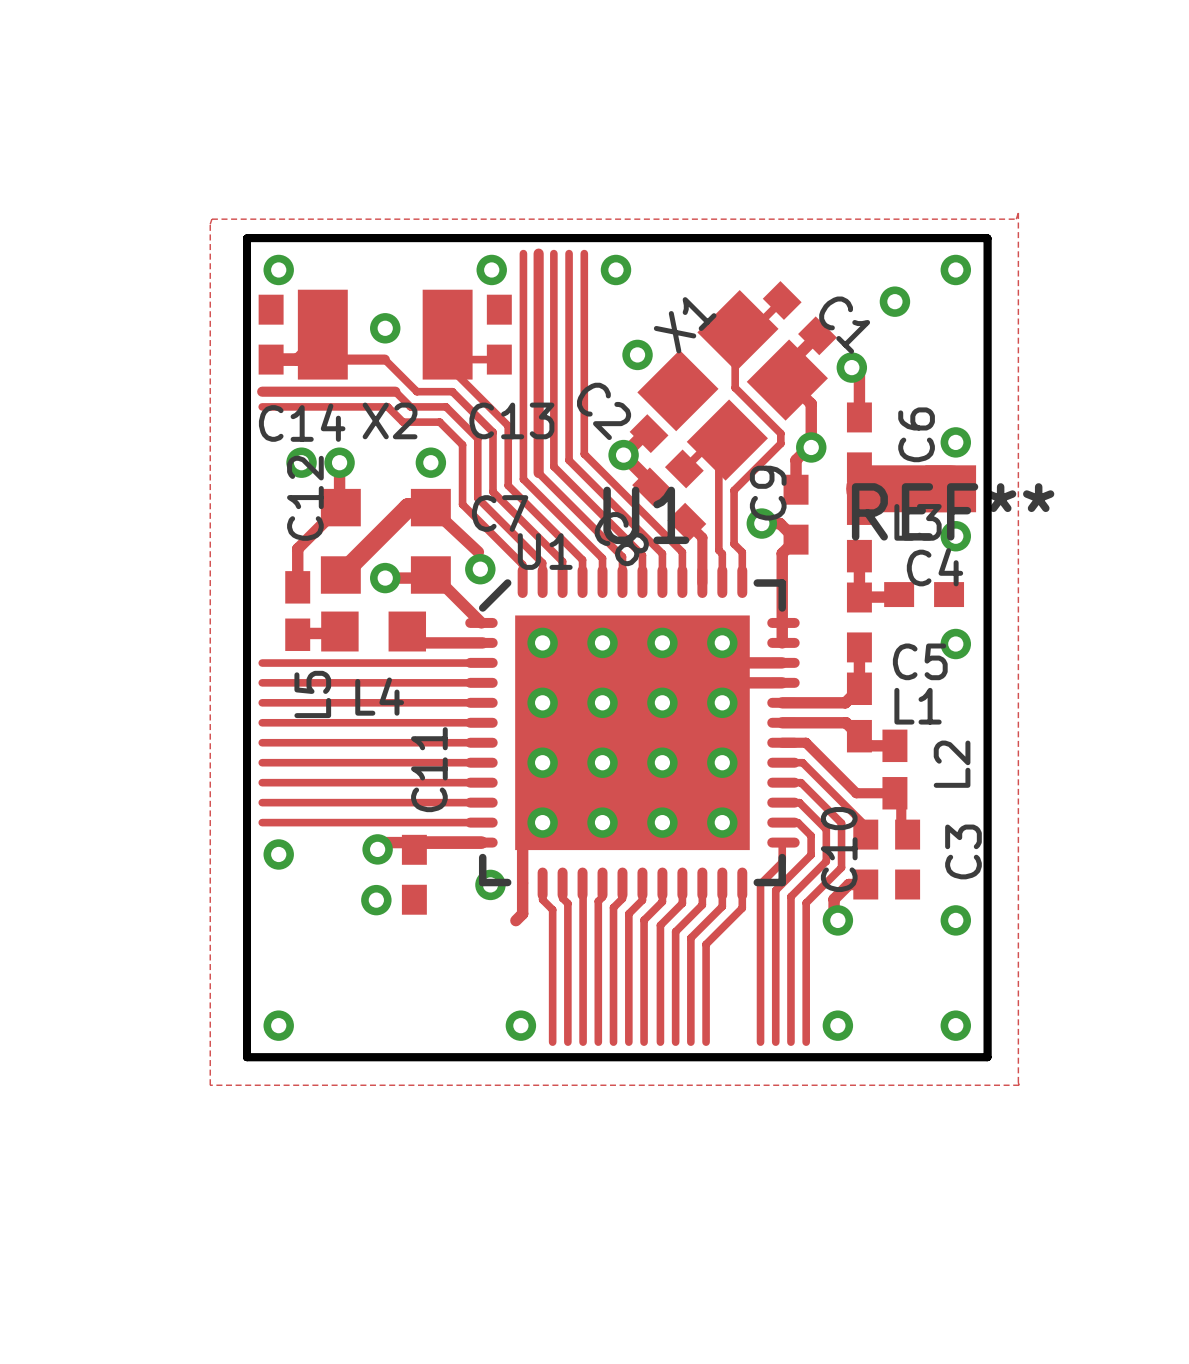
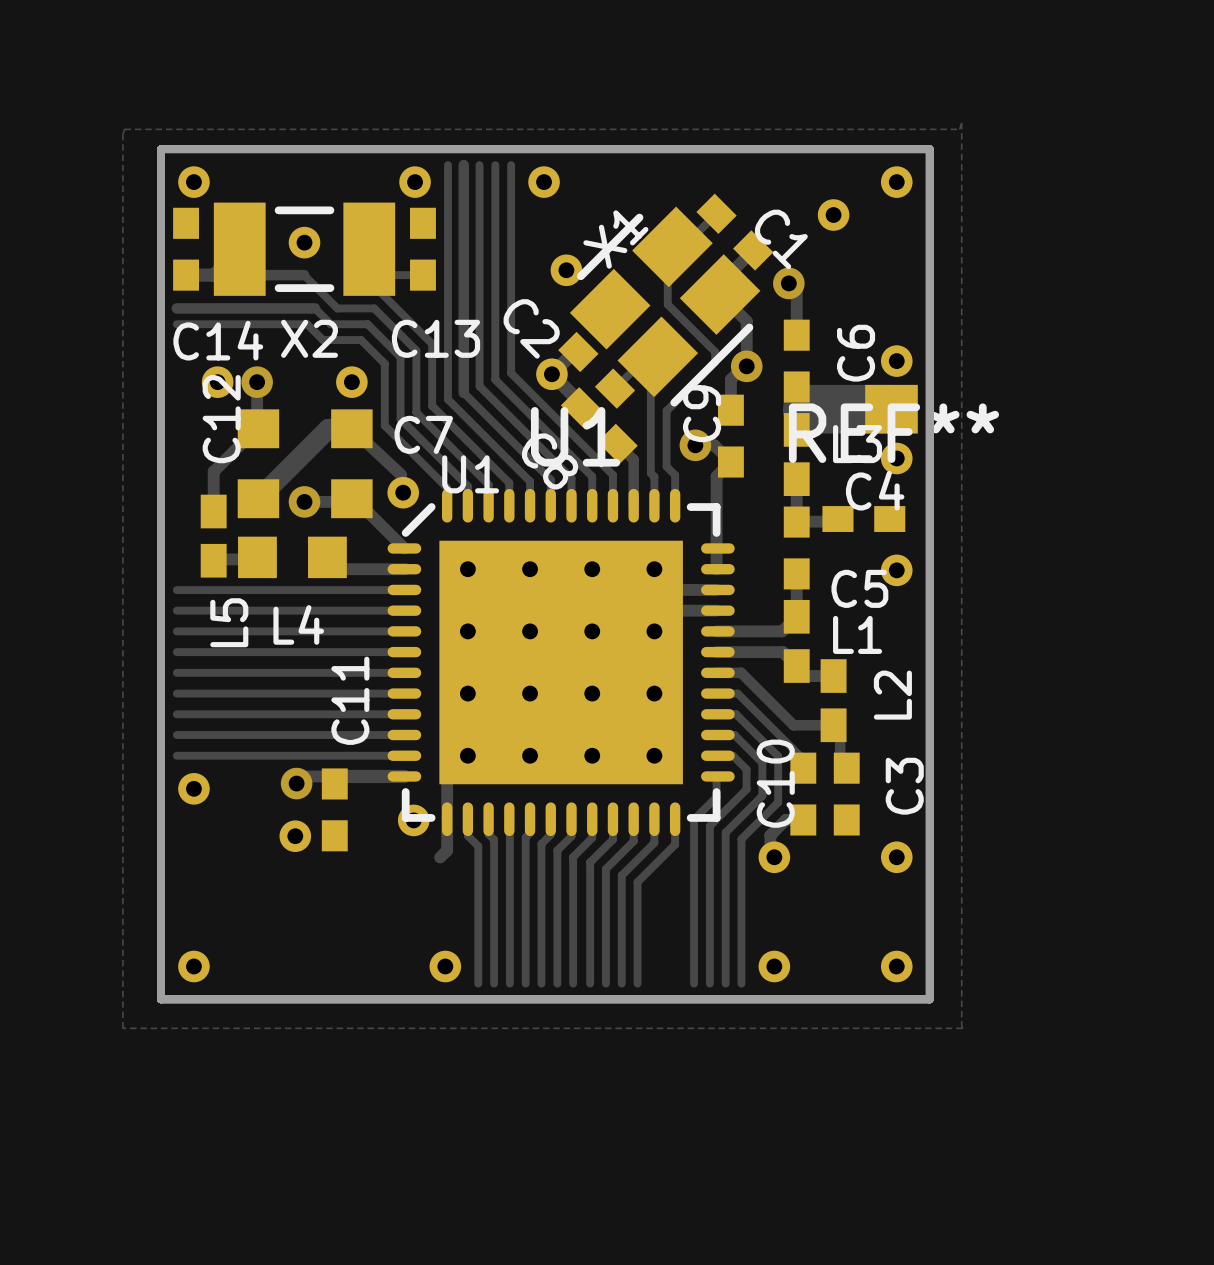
part footprint: [297, 289, 473, 380] -> [213, 202, 396, 296]
part footprint: [637, 290, 828, 481] -> [569, 206, 761, 407]

